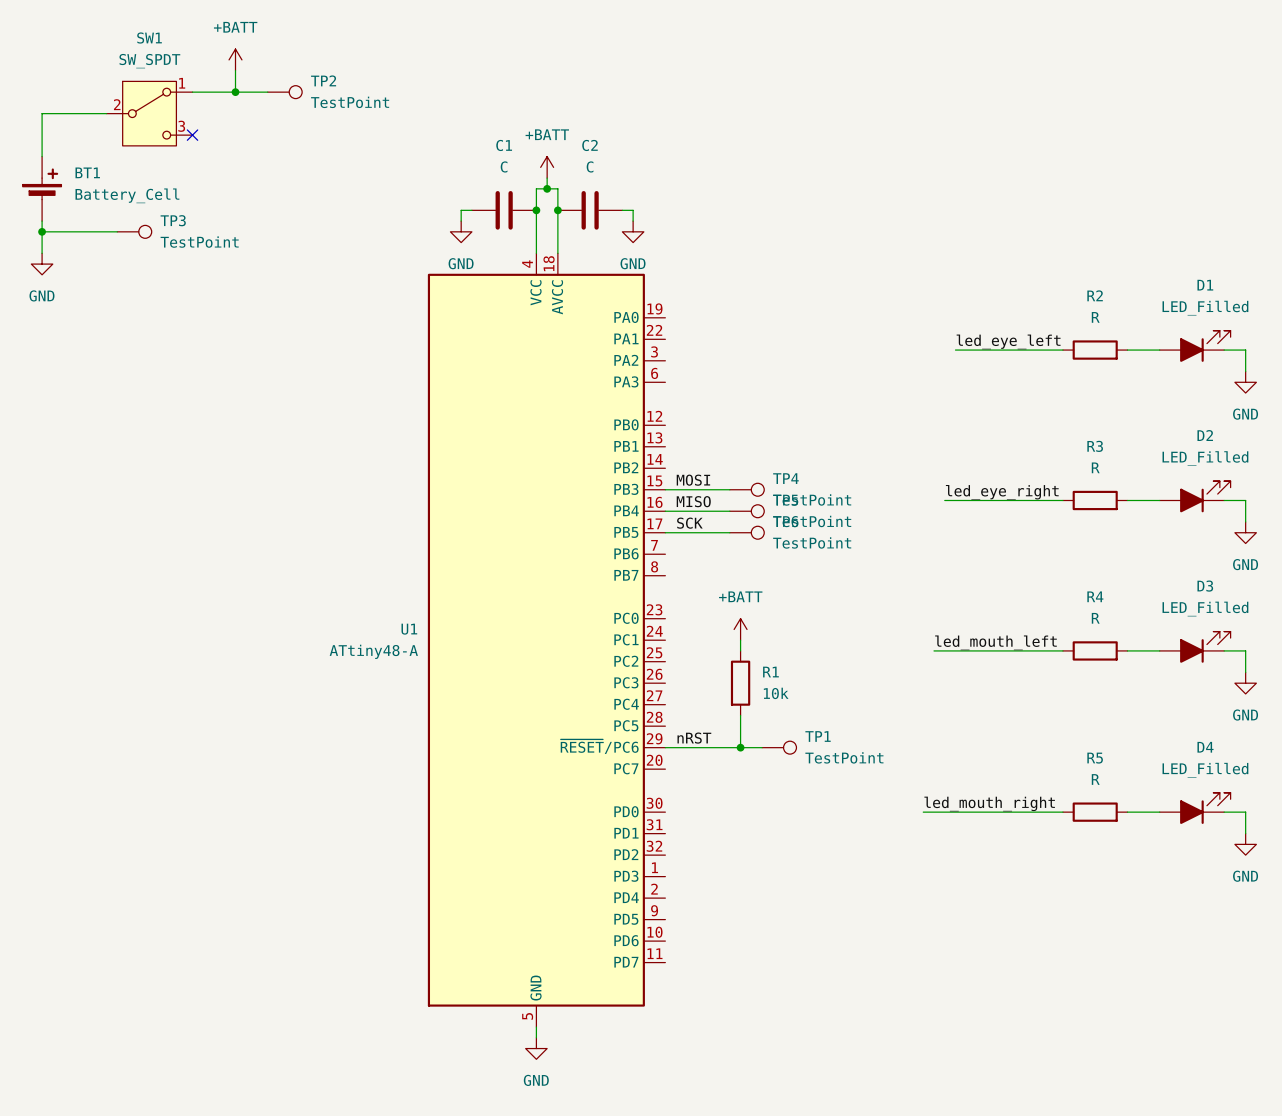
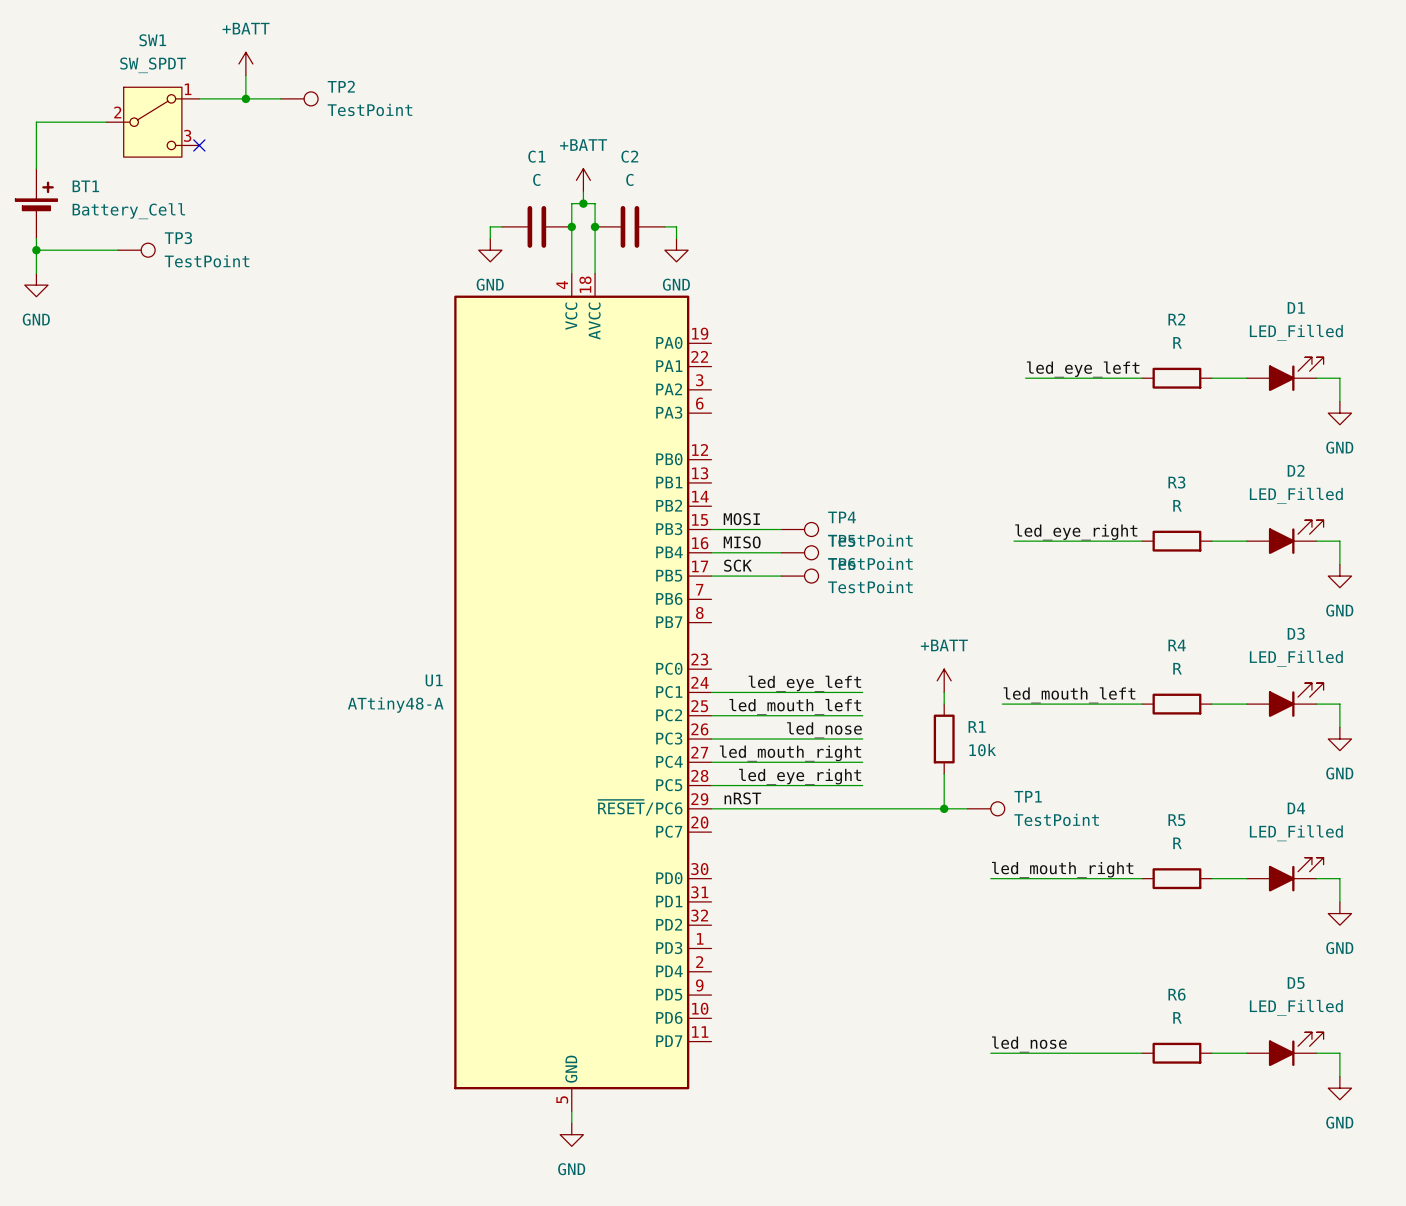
power symbol position: +BATT (740, 629) -> +BATT (944, 680)
label: none -> led_eye_left (804, 683)
wire: none -> (711, 692) (862, 692)
wire: (740, 640) (740, 650) -> (944, 692) (944, 704)
label: none -> led_mouth_left (795, 706)
wire: none -> (711, 715) (862, 715)
label: none -> led_nose (824, 730)
wire: none -> (711, 739) (862, 739)
R1 position: (740, 683) -> (944, 739)
label: none -> led_mouth_right (790, 753)
wire: none -> (711, 762) (862, 762)
wire: (740, 715) (740, 747) -> (944, 773) (944, 808)
label: none -> led_eye_right (800, 776)
wire: none -> (711, 785) (862, 785)
junction: (740, 747) -> none
wire: none -> (816, 808) (967, 808)
TP1 position: (779, 747) -> (986, 808)
junction: none -> (944, 808)
label: none -> led_nose (1029, 1044)
D5: none -> LED_Filled (1285, 1049)
wire: none -> (990, 1053) (1142, 1053)
R6: none -> R (1176, 1053)
wire: none -> (1211, 1053) (1246, 1053)
wire: none -> (1316, 1053) (1339, 1053) (1339, 1076)
power symbol: none -> GND (1339, 1088)

